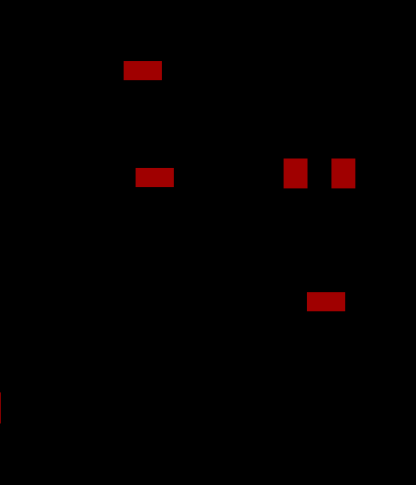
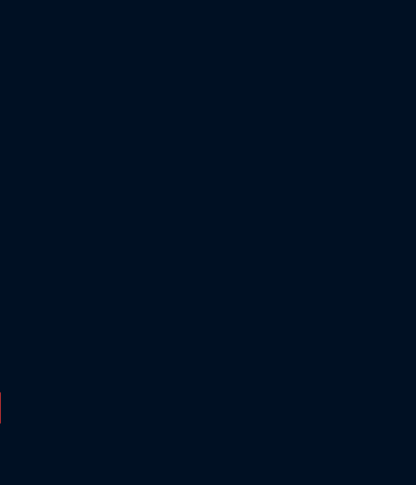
part: (142, 70) -> none
part: (319, 173) -> none
part: (154, 177) -> none
part: (326, 301) -> none

